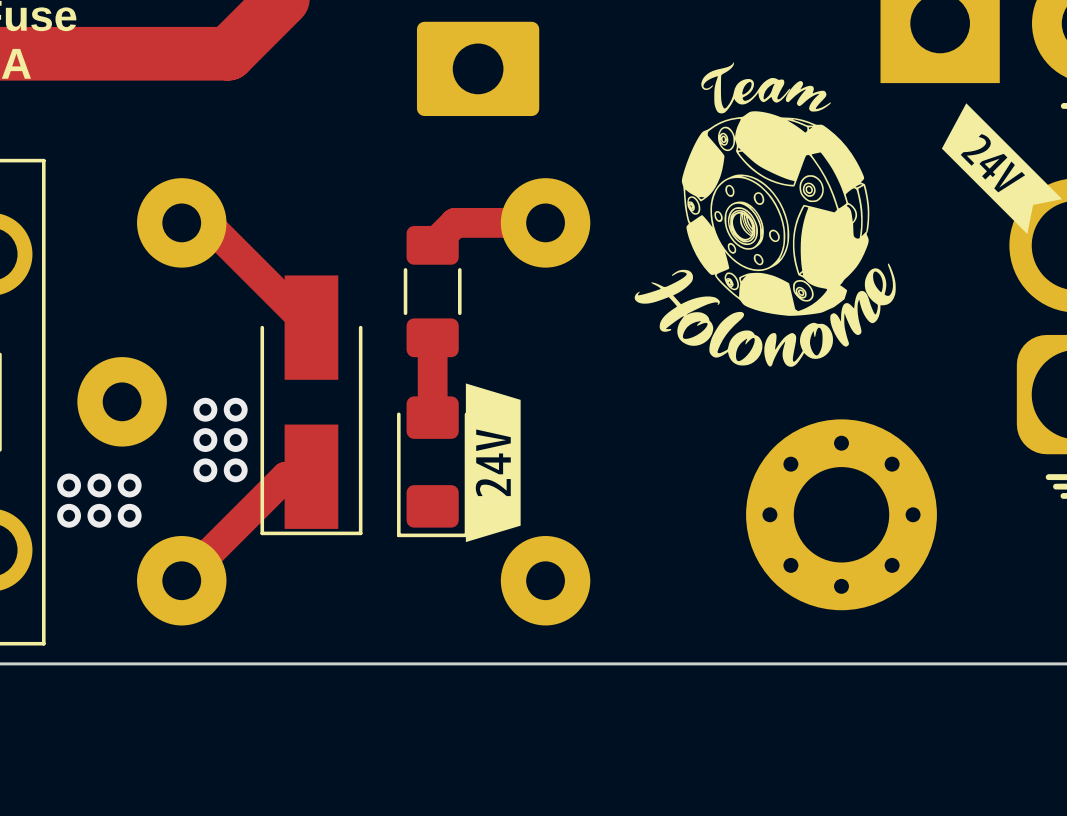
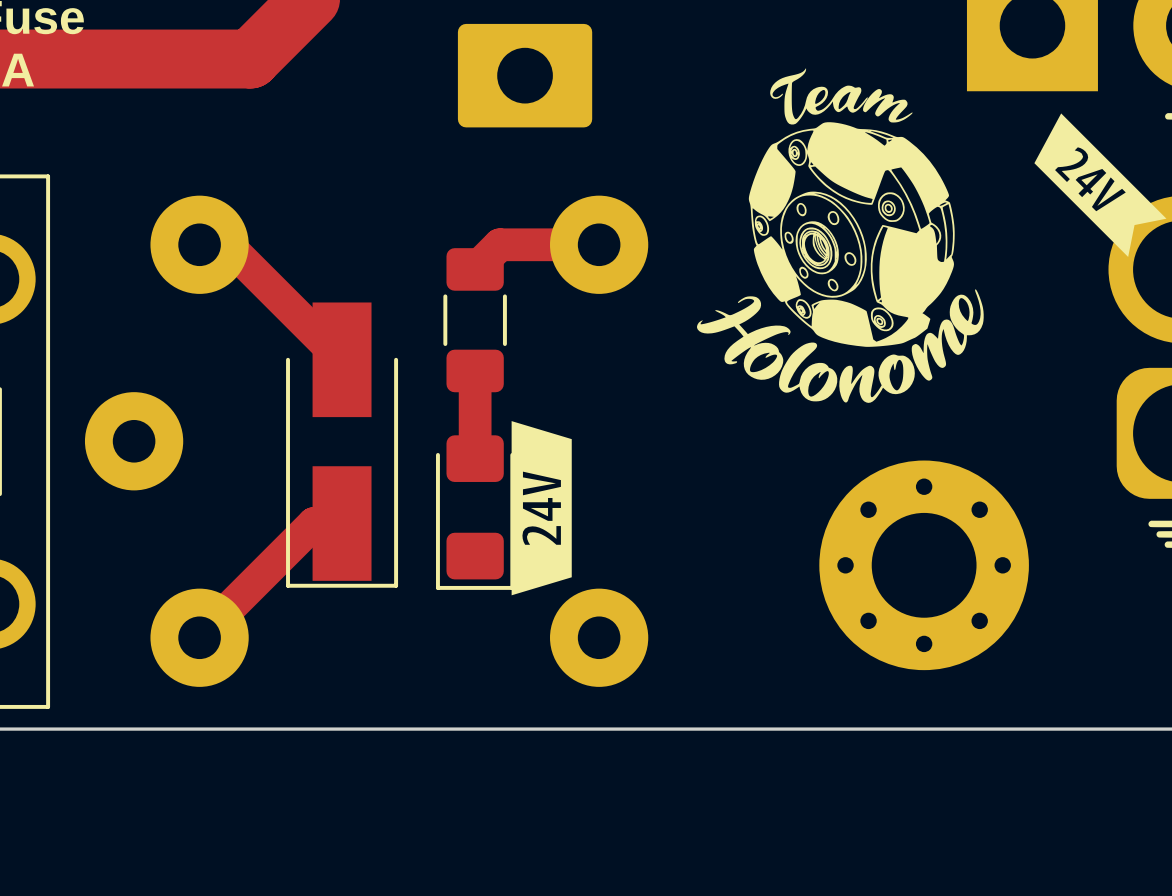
via: (205, 409) -> none
via: (235, 409) -> none
via: (205, 440) -> none
via: (235, 440) -> none
via: (205, 470) -> none
via: (235, 470) -> none
via: (69, 485) -> none
via: (99, 485) -> none
via: (129, 485) -> none
via: (69, 515) -> none
via: (99, 515) -> none
via: (129, 515) -> none

